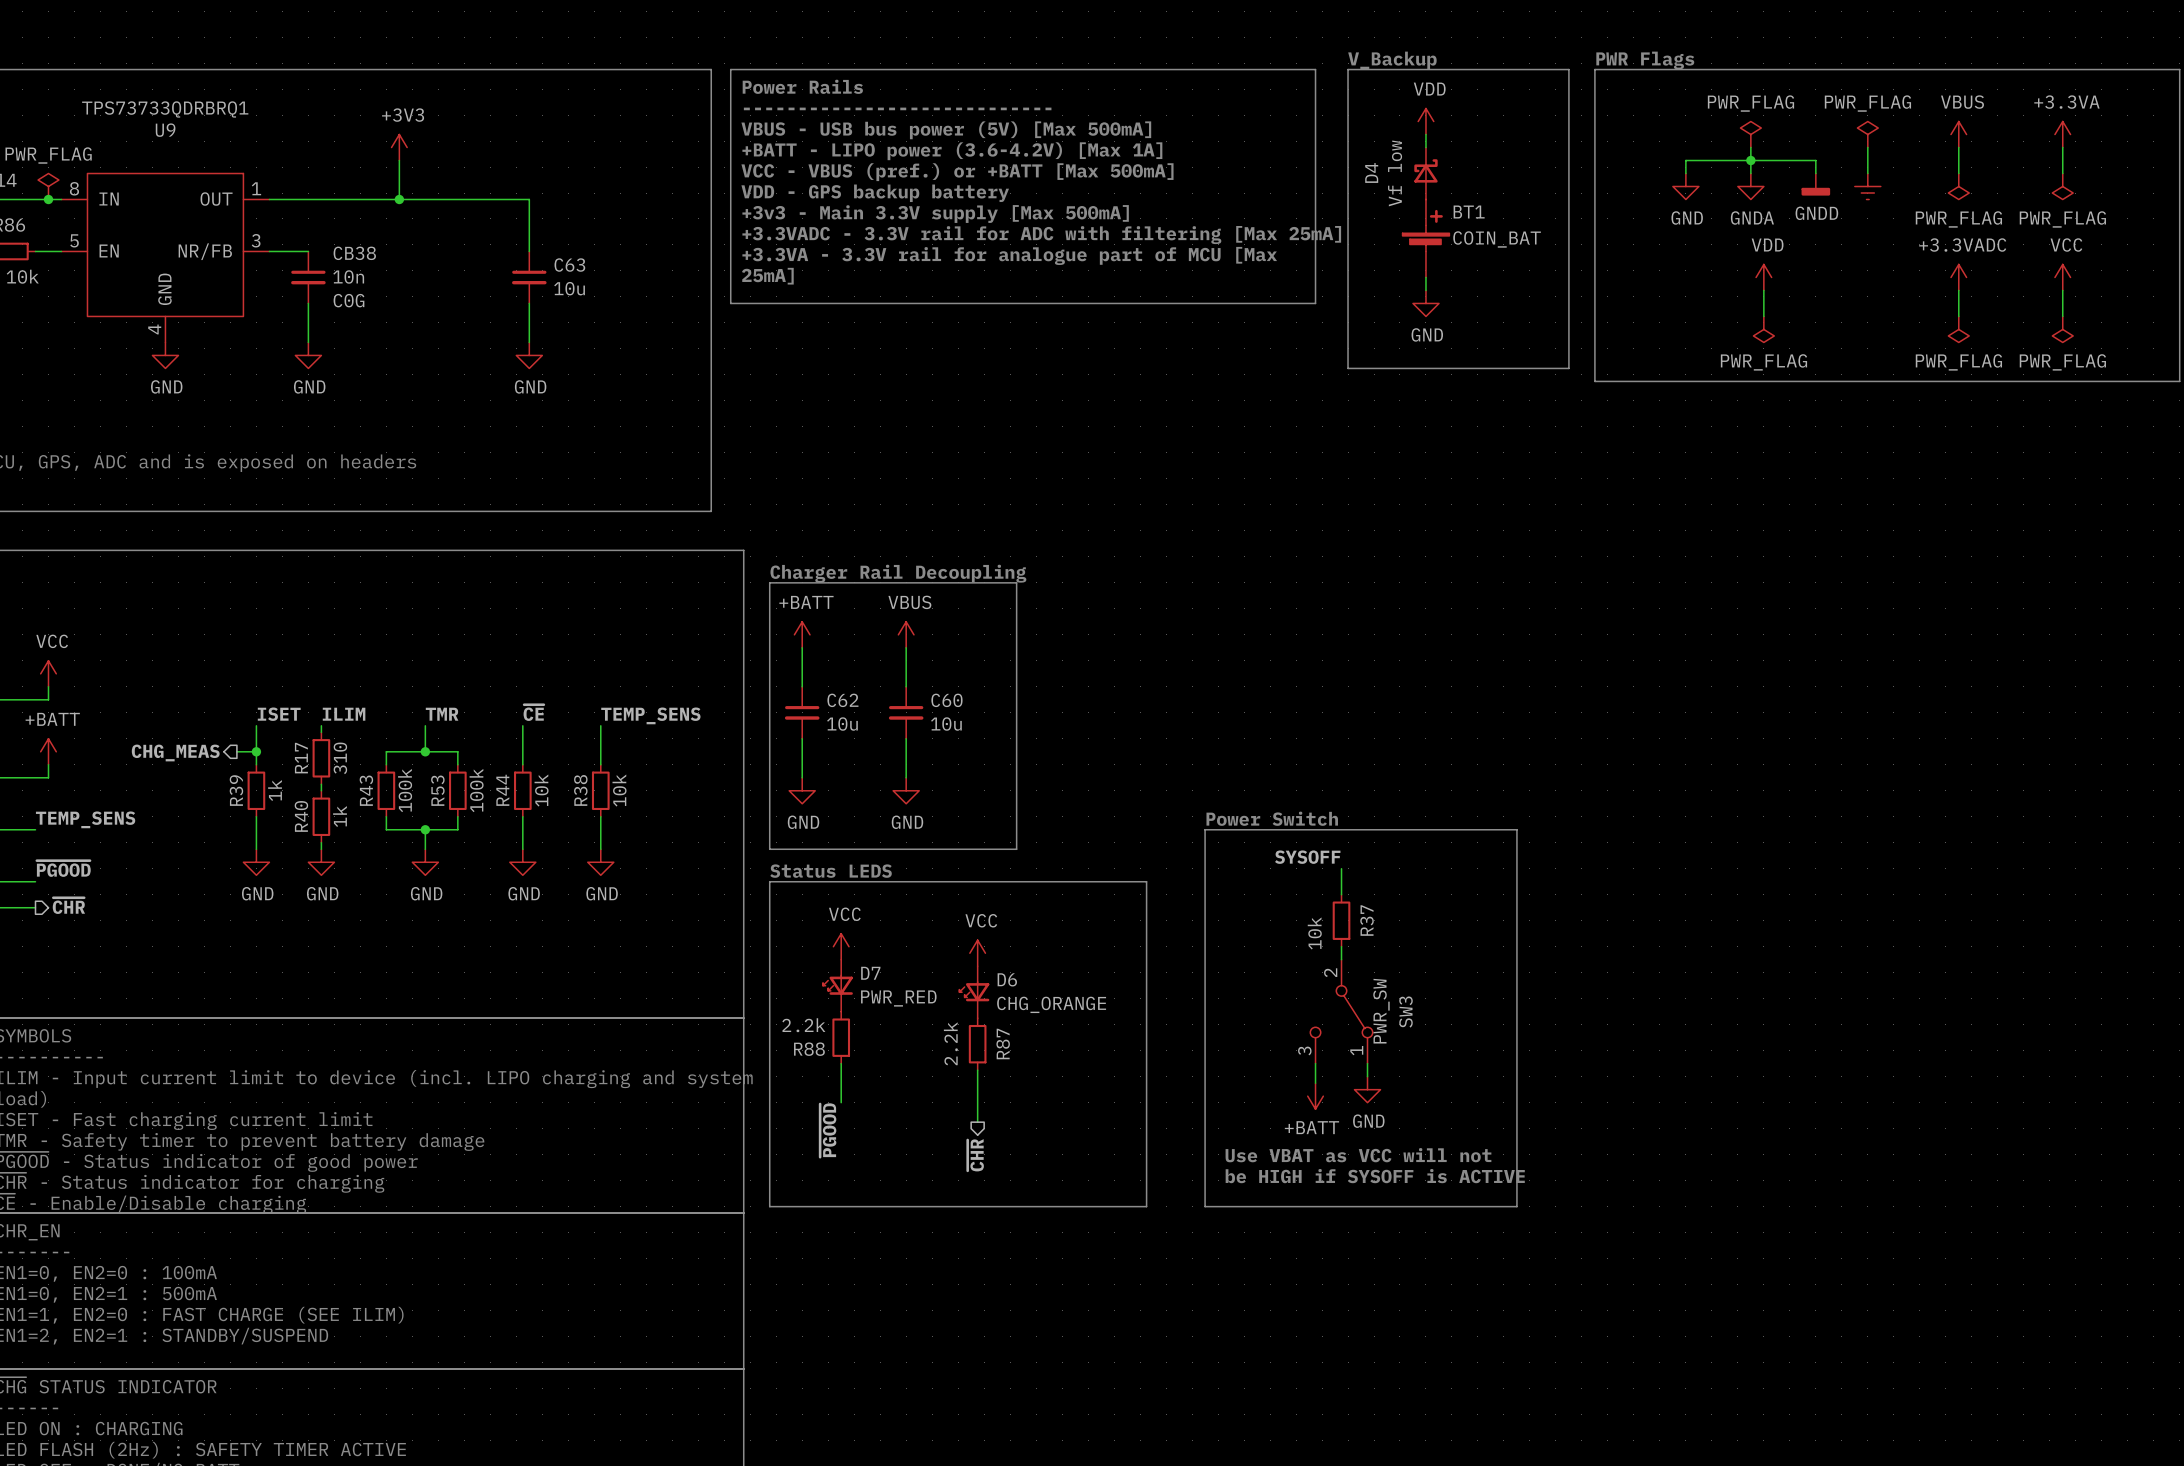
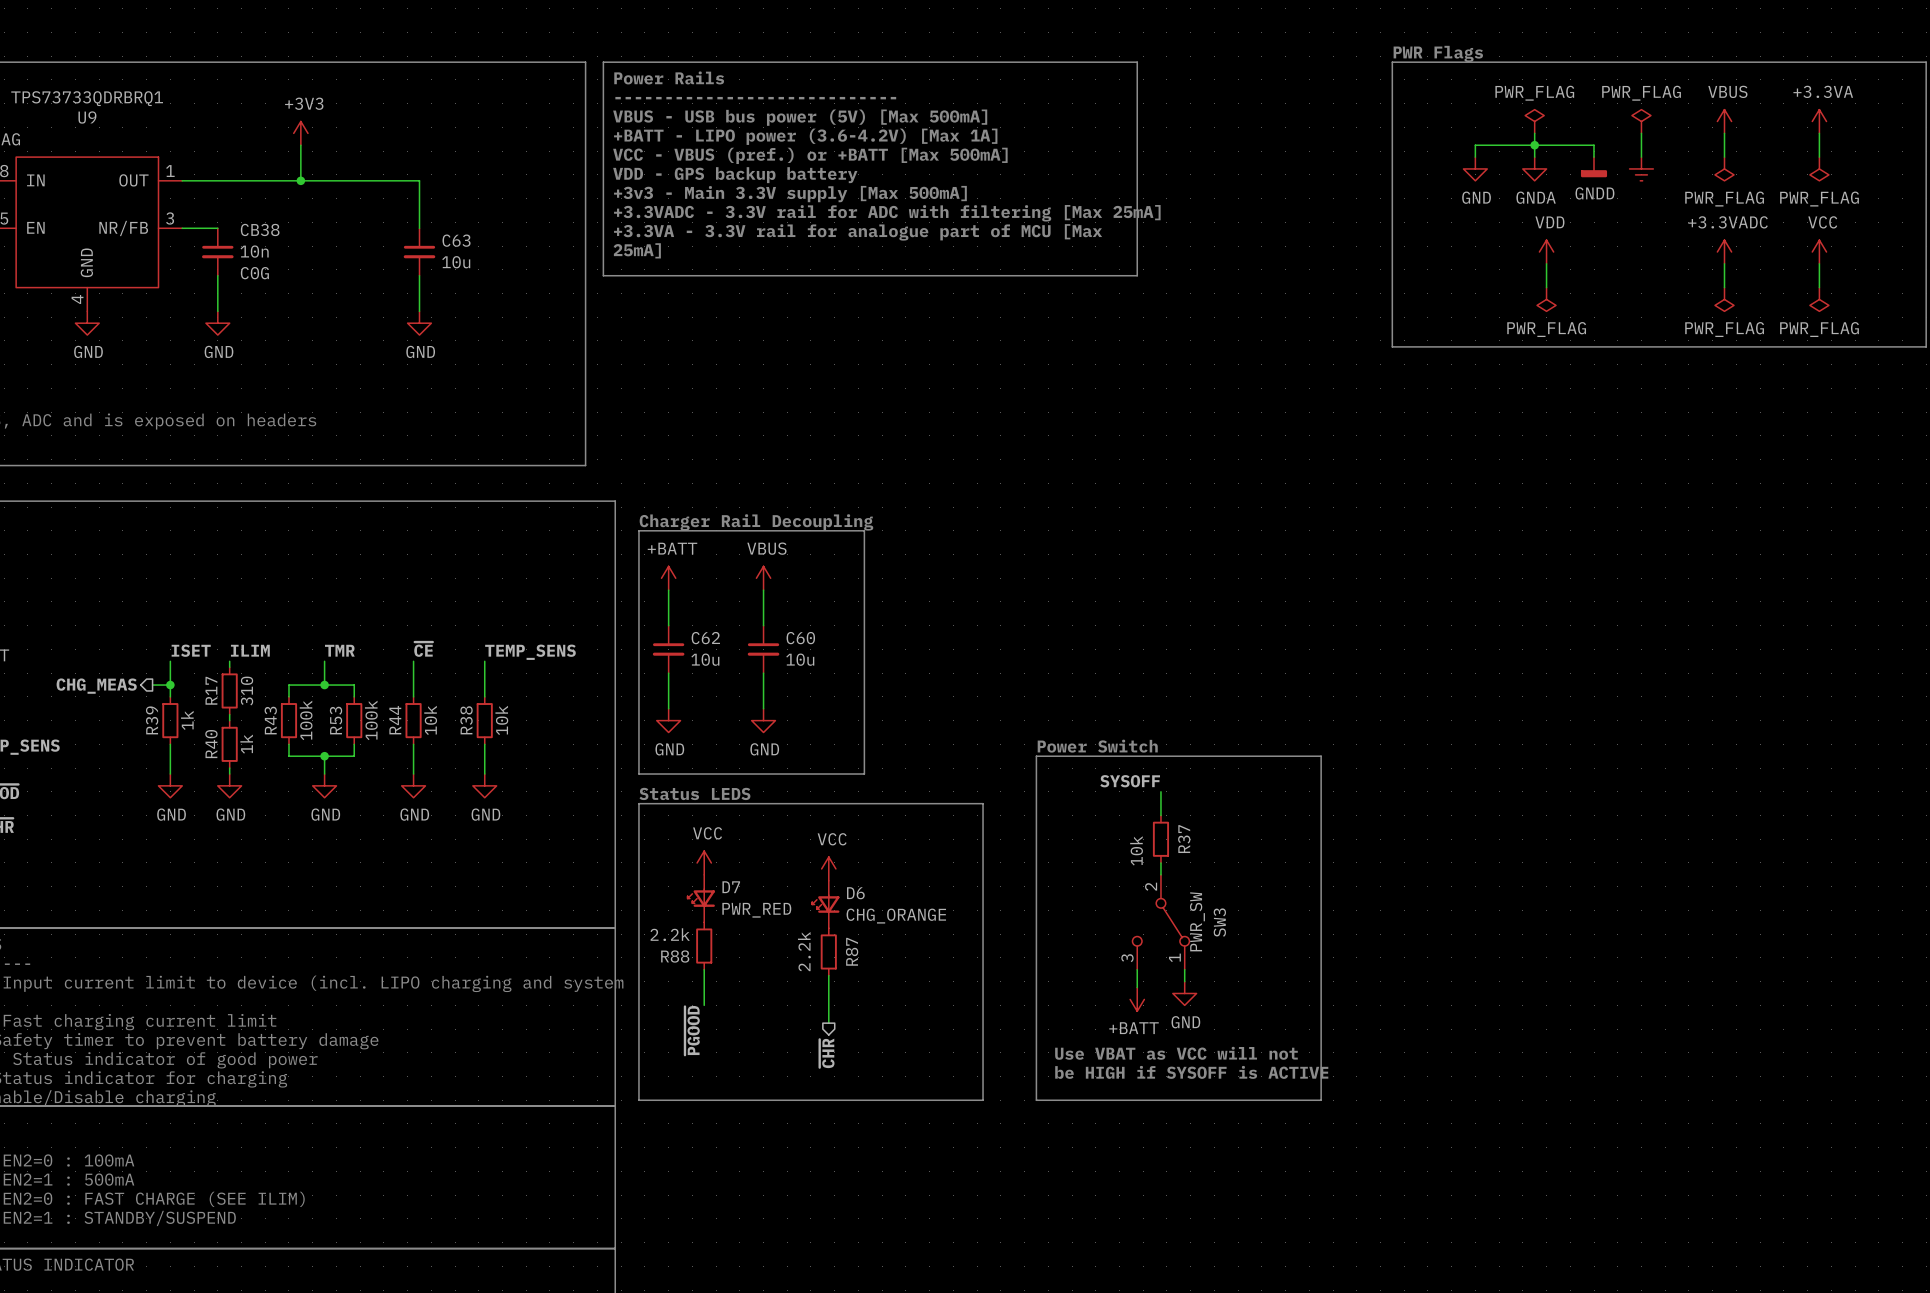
text: V_Backup (1392, 60) -> none
line: (1348, 69) (1568, 69) (1568, 368) (1348, 368) (1348, 69) -> none
power symbol: VDD (1425, 121) -> none
wire: (1425, 134) (1425, 147) -> none
D4: Vf low (1425, 173) -> none
BT1: COIN_BAT (1425, 238) -> none
wire: (1425, 277) (1425, 290) -> none
power symbol: GND (1425, 303) -> none

